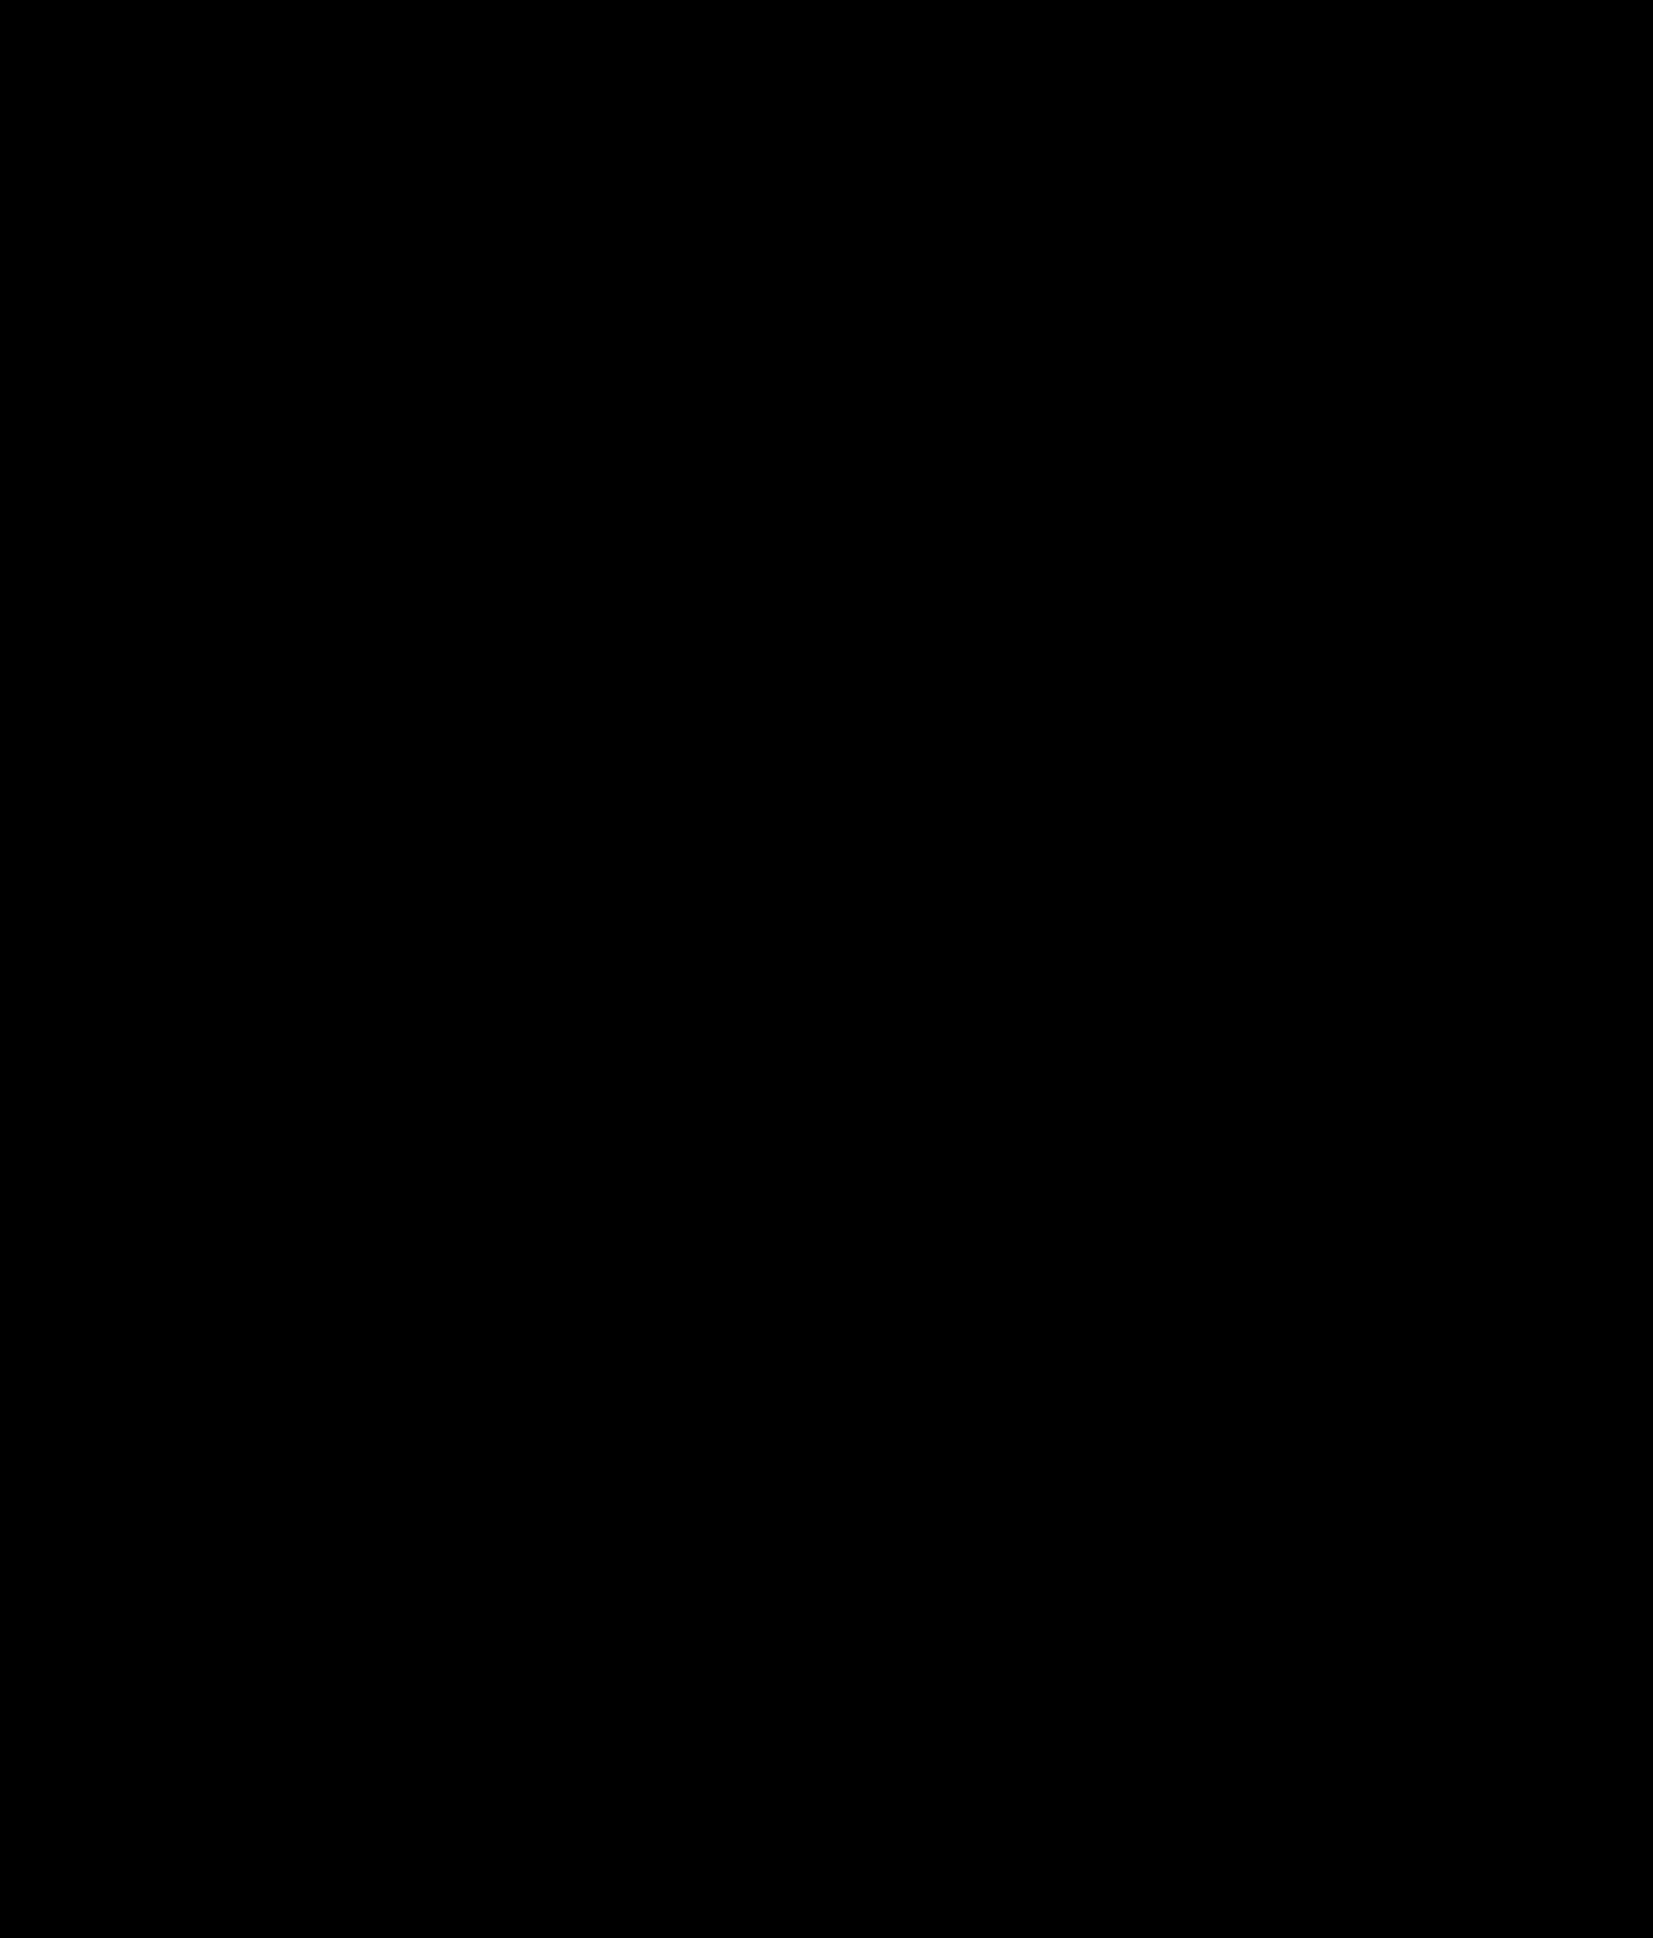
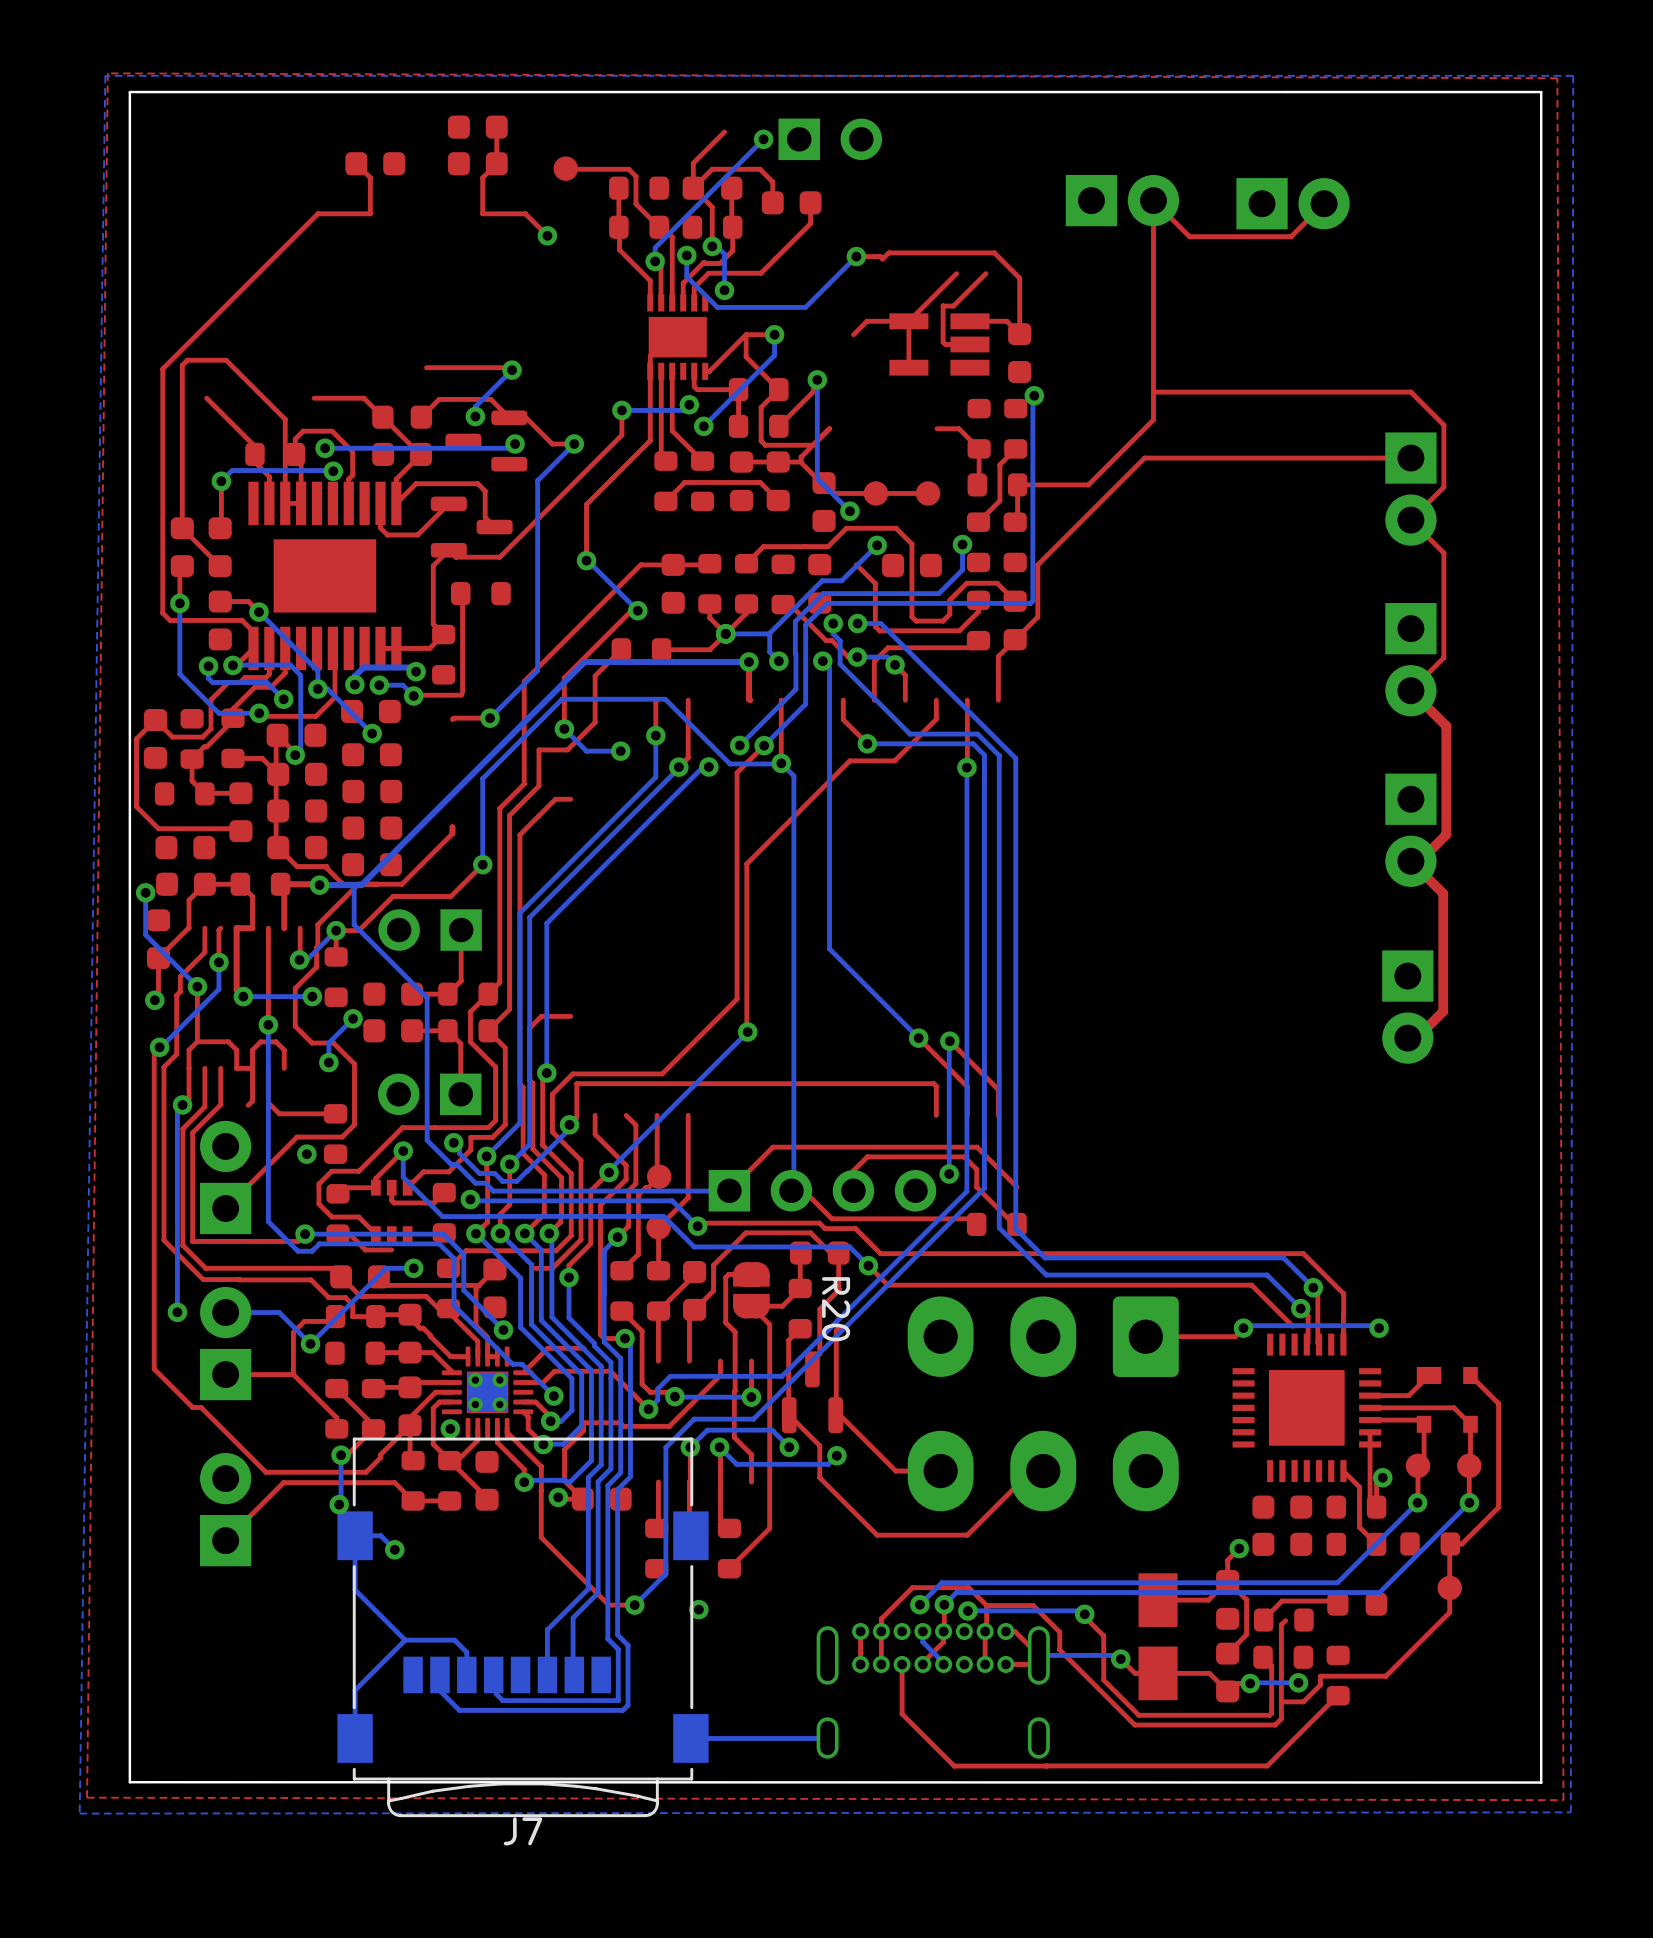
top zone outline: none -> (107, 73) (1557, 78) (1563, 1800) (87, 1797) (107, 73)
bottom zone outline: none -> (1573, 75) (1570, 1812) (79, 1813) (105, 75) (1573, 75)
board edge: none -> (1541, 92) (1541, 1782) (129, 1782) (129, 92) (1541, 92)
part: none -> (477, 127)
top track: none -> (496, 127) (496, 163) (482, 177) (482, 213) (525, 213) (547, 235)
top track: none -> (724, 132) (693, 163) (693, 188)
bottom track: none -> (763, 139) (655, 247) (655, 261)
via: none -> (763, 139)
part: none -> (830, 139)
top track: none -> (356, 163) (370, 177) (370, 213) (317, 213) (162, 368) (162, 613) (170, 620) (242, 620) (253, 631) (253, 648) (236, 665) (232, 665)
part: none -> (375, 163)
part: none -> (477, 163)
top track: none -> (565, 168) (628, 169) (635, 176) (635, 204) (659, 227) (662, 227) (672, 237) (672, 302)
part: none -> (565, 168)
top track: none -> (618, 188) (619, 249) (650, 280) (650, 302)
part: none -> (639, 188)
top track: none -> (693, 188) (712, 169) (759, 169) (772, 182) (772, 202)
top track: none -> (693, 188) (712, 207) (712, 246)
part: none -> (712, 188)
top track: none -> (731, 188) (732, 250) (720, 263) (704, 262) (683, 283) (683, 302)
part: none -> (1122, 200)
part: none -> (791, 202)
top track: none -> (810, 202) (810, 223) (760, 273) (708, 273) (694, 287) (694, 302)
part: none -> (1293, 203)
top track: none -> (1324, 203) (1291, 236) (1189, 236) (1153, 200) (1153, 419) (1088, 484) (1017, 484) (1017, 519) (1015, 522)
part: none -> (639, 227)
part: none -> (712, 227)
via: none -> (547, 235)
bottom track: none -> (712, 246) (716, 246) (724, 254) (724, 290)
via: none -> (712, 246)
bottom track: none -> (686, 255) (686, 276) (717, 307) (805, 307) (856, 256)
via: none -> (686, 255)
top track: none -> (856, 256) (880, 256) (882, 259) (888, 252) (994, 252) (1019, 278) (1019, 334) (1006, 321) (969, 321)
via: none -> (856, 256)
top track: none -> (655, 261) (661, 267) (661, 302)
via: none -> (655, 261)
top track: none -> (956, 273) (908, 321)
top track: none -> (985, 273) (953, 306) (943, 306) (943, 342) (945, 344) (969, 344)
via: none -> (724, 290)
top track: none -> (908, 321) (867, 321) (853, 334)
top track: none -> (908, 321) (908, 367)
top track: none -> (746, 334) (709, 371) (705, 371)
top track: none -> (746, 334) (746, 356) (778, 389) (761, 407) (761, 440) (765, 445) (813, 445)
top track: none -> (774, 334) (746, 334)
bottom track: none -> (774, 334) (774, 355) (703, 426)
via: none -> (774, 334)
top track: none -> (677, 337) (669, 337) (650, 356) (650, 440) (586, 504) (586, 560)
part: none -> (677, 337)
part: none -> (939, 344)
part: none -> (1019, 353)
top track: none -> (426, 367) (509, 367) (512, 370)
bottom track: none -> (512, 370) (475, 406) (475, 416)
via: none -> (512, 370)
top track: none -> (661, 371) (661, 456) (665, 461)
top track: none -> (672, 371) (672, 430) (702, 461)
top track: none -> (694, 371) (694, 386) (697, 389) (738, 389) (738, 426)
top track: none -> (817, 379) (813, 383) (813, 391) (778, 426)
bottom track: none -> (817, 379) (817, 478) (849, 511)
via: none -> (817, 379)
part: none -> (758, 389)
top track: none -> (1153, 392) (1410, 392) (1443, 425) (1443, 487) (1410, 520) (1443, 553) (1443, 657) (1410, 690) (1446, 726) (1446, 834) (1419, 861) (1410, 861) (1443, 893) (1443, 1011) (1416, 1038)
bottom track: none -> (1034, 395) (1032, 600) (1030, 603) (827, 603) (805, 624) (805, 704) (764, 745)
via: none -> (1034, 395)
top track: none -> (206, 398) (254, 446) (254, 462) (269, 476) (269, 503)
top track: none -> (314, 398) (363, 398) (421, 454) (396, 479) (396, 503) (416, 483) (477, 483) (485, 491) (485, 517) (494, 527)
bottom track: none -> (689, 404) (683, 410) (621, 410)
via: none -> (689, 404)
top track: none -> (621, 410) (621, 435) (499, 557) (455, 557) (448, 550) (433, 565) (433, 624) (443, 634) (429, 648) (380, 648)
via: none -> (621, 410)
via: none -> (475, 416)
part: none -> (402, 417)
top track: none -> (421, 417) (439, 399) (490, 399) (509, 417) (526, 417) (552, 444) (574, 444)
via: none -> (703, 426)
part: none -> (758, 426)
top track: none -> (829, 428) (801, 457) (801, 462) (741, 462)
top track: none -> (937, 428) (958, 428) (979, 448) (979, 483) (977, 484)
part: none -> (979, 428)
part: none -> (1015, 428)
part: none -> (486, 440)
bottom track: none -> (515, 444) (510, 448) (325, 448)
via: none -> (515, 444)
bottom track: none -> (574, 444) (537, 480) (537, 670) (490, 718)
via: none -> (574, 444)
via: none -> (325, 448)
top track: none -> (1015, 448) (999, 464) (999, 500) (978, 522)
part: none -> (275, 454)
part: none -> (402, 454)
top track: none -> (1410, 458) (1144, 458) (1037, 564) (1037, 617) (998, 656) (998, 700)
top track: none -> (802, 464) (834, 493) (928, 493)
bottom track: none -> (333, 471) (232, 470) (221, 481)
via: none -> (333, 471)
top track: none -> (221, 481) (220, 528)
via: none -> (221, 481)
part: none -> (665, 481)
part: none -> (702, 481)
part: none -> (741, 481)
part: none -> (778, 481)
part: none -> (997, 484)
part: none -> (1410, 489)
part: none -> (875, 493)
part: none -> (928, 493)
top track: none -> (778, 500) (760, 482) (684, 482) (665, 501)
part: none -> (824, 502)
top track: none -> (348, 503) (348, 479) (352, 475) (352, 451) (332, 431) (303, 431) (295, 439) (295, 454) (301, 460) (301, 503) (285, 503) (285, 419) (226, 360) (187, 360) (182, 365) (182, 528) (220, 566)
top track: none -> (380, 503) (380, 528) (387, 534) (417, 534) (448, 503)
via: none -> (849, 511)
part: none -> (471, 527)
part: none -> (978, 542)
part: none -> (1015, 542)
bottom track: none -> (962, 544) (962, 569) (938, 593) (823, 593) (795, 621) (795, 689) (739, 745)
via: none -> (962, 544)
bottom track: none -> (877, 545) (841, 580) (822, 580) (769, 633) (725, 633)
via: none -> (877, 545)
top track: none -> (805, 546) (763, 546) (746, 563)
top track: none -> (805, 546) (828, 546) (846, 528) (896, 528) (911, 544) (911, 616) (916, 621) (943, 621) (949, 614) (949, 600) (966, 583) (997, 583) (1015, 601)
part: none -> (182, 547)
part: none -> (220, 547)
bottom track: none -> (586, 560) (637, 610)
via: none -> (586, 560)
top track: none -> (709, 563) (640, 564) (524, 681) (524, 784) (499, 808) (499, 982) (470, 1011) (470, 1041) (495, 1066) (495, 1120) (488, 1127) (402, 1127) (358, 1171) (331, 1171) (318, 1184) (318, 1204) (331, 1217) (358, 1217) (375, 1234)
top track: none -> (856, 564) (875, 583) (875, 626) (879, 630) (959, 630) (978, 611) (978, 600)
part: none -> (911, 565)
top track: none -> (182, 566) (179, 568) (179, 603)
part: none -> (324, 575)
part: none -> (673, 583)
part: none -> (709, 583)
part: none -> (746, 583)
part: none -> (819, 583)
part: none -> (783, 584)
top track: none -> (460, 593) (462, 595) (462, 692)
part: none -> (480, 593)
top track: none -> (220, 601) (248, 601) (259, 612)
bottom track: none -> (179, 603) (179, 674) (218, 713) (259, 713)
via: none -> (179, 603)
top track: none -> (709, 603) (709, 618) (725, 633)
top track: none -> (746, 603) (746, 613) (709, 649) (661, 649)
top track: none -> (783, 604) (790, 604) (826, 640) (831, 640) (848, 657) (857, 657)
top track: none -> (637, 610) (631, 610) (564, 677) (564, 728)
via: none -> (637, 610)
bottom track: none -> (259, 612) (317, 670) (317, 689) (327, 689) (372, 733)
via: none -> (259, 612)
part: none -> (220, 620)
part: none -> (978, 620)
part: none -> (1015, 620)
bottom track: none -> (833, 623) (833, 633) (840, 640) (840, 664) (910, 734) (977, 734) (999, 755) (999, 1227) (1046, 1275) (1267, 1275) (1300, 1308)
via: none -> (833, 623)
bottom track: none -> (857, 623) (880, 623) (1015, 758) (1015, 1228) (1044, 1257) (1283, 1257) (1313, 1287)
via: none -> (857, 623)
via: none -> (725, 633)
bottom track: none -> (769, 633) (769, 652) (778, 661)
top track: none -> (978, 640) (971, 647) (887, 647) (874, 661) (874, 700)
top track: none -> (269, 648) (269, 674) (265, 677) (245, 677) (240, 682) (228, 682) (210, 699) (210, 728) (202, 737) (172, 737) (155, 720) (136, 738) (136, 806) (158, 828) (238, 828) (240, 831)
top track: none -> (285, 648) (285, 673) (270, 687) (254, 687) (232, 709) (232, 720) (192, 759) (192, 781) (204, 793) (240, 793)
top track: none -> (332, 648) (334, 650) (334, 697) (316, 716) (262, 716) (259, 713)
top track: none -> (621, 649) (595, 675) (595, 722) (567, 749) (538, 749) (538, 786) (509, 815) (509, 1009) (488, 1030) (505, 1047) (505, 1124) (492, 1137) (470, 1137) (470, 1149) (448, 1171) (423, 1171) (407, 1187)
part: none -> (641, 649)
part: none -> (443, 654)
bottom track: none -> (857, 657) (887, 657) (895, 664)
via: none -> (857, 657)
part: none -> (1410, 659)
top track: none -> (748, 661) (750, 700)
bottom track: none -> (748, 661) (584, 661) (361, 885) (319, 885)
via: none -> (748, 661)
via: none -> (778, 661)
bottom track: none -> (822, 661) (829, 667) (829, 948) (918, 1038)
via: none -> (822, 661)
top track: none -> (895, 664) (905, 675) (905, 700)
via: none -> (895, 664)
bottom track: none -> (232, 665) (290, 665) (300, 675) (300, 749) (295, 755)
via: none -> (232, 665)
bottom track: none -> (208, 666) (208, 678) (212, 682) (266, 682) (283, 699)
via: none -> (208, 666)
bottom track: none -> (416, 671) (411, 667) (363, 667) (354, 676) (354, 684)
via: none -> (416, 671)
via: none -> (354, 684)
bottom track: none -> (379, 685) (402, 685) (413, 696)
via: none -> (379, 685)
via: none -> (317, 689)
top track: none -> (461, 695) (413, 696)
via: none -> (413, 696)
via: none -> (283, 699)
top track: none -> (657, 700) (655, 735)
top track: none -> (688, 700) (688, 757) (678, 767)
top track: none -> (781, 700) (781, 763)
top track: none -> (843, 700) (843, 719) (867, 743)
top track: none -> (936, 700) (936, 719) (894, 760) (849, 760) (746, 863) (747, 1032)
top track: none -> (967, 700) (966, 767)
part: none -> (370, 711)
via: none -> (259, 713)
top track: none -> (490, 718) (452, 719)
via: none -> (490, 718)
bottom track: none -> (564, 728) (586, 751) (620, 751)
via: none -> (564, 728)
via: none -> (372, 733)
part: none -> (296, 735)
bottom track: none -> (655, 735) (655, 777) (519, 912) (519, 1123) (486, 1156)
via: none -> (655, 735)
part: none -> (155, 738)
part: none -> (192, 738)
part: none -> (232, 738)
bottom track: none -> (867, 743) (973, 743) (984, 755) (984, 1188) (753, 1419) (694, 1419) (665, 1447) (665, 1573) (634, 1605)
via: none -> (867, 743)
via: none -> (739, 745)
top track: none -> (764, 745) (737, 772) (737, 999) (662, 1073) (572, 1073) (552, 1094) (552, 1131) (580, 1160) (580, 1239) (552, 1268) (535, 1268)
via: none -> (764, 745)
via: none -> (620, 751)
part: none -> (371, 754)
top track: none -> (295, 755) (277, 735) (276, 845) (297, 866) (326, 866) (342, 884) (401, 884) (452, 833) (452, 827)
via: none -> (295, 755)
top track: none -> (232, 758) (262, 758) (278, 774)
via: none -> (781, 763)
bottom track: none -> (678, 767) (529, 917) (529, 1144) (509, 1164)
via: none -> (678, 767)
bottom track: none -> (708, 767) (703, 767) (546, 923) (546, 1073)
via: none -> (708, 767)
bottom track: none -> (966, 767) (966, 1191) (781, 1376) (670, 1376) (657, 1388) (657, 1400) (648, 1409)
via: none -> (966, 767)
part: none -> (297, 774)
part: none -> (372, 791)
part: none -> (184, 793)
top track: none -> (570, 799) (555, 799) (519, 834) (519, 1084) (523, 1087) (523, 1153) (544, 1174) (544, 1213) (524, 1233)
part: none -> (297, 810)
part: none -> (240, 812)
part: none -> (372, 828)
part: none -> (1410, 830)
part: none -> (185, 847)
part: none -> (297, 847)
part: none -> (371, 864)
top track: none -> (482, 864) (450, 896) (392, 896) (358, 930) (336, 930) (336, 956)
bottom track: none -> (482, 864) (482, 778) (562, 699) (665, 699) (730, 763) (781, 763) (793, 775) (793, 1188) (791, 1190)
via: none -> (482, 864)
part: none -> (185, 884)
part: none -> (260, 884)
top track: none -> (358, 884) (317, 924) (316, 967) (295, 988) (295, 1026) (311, 1043) (333, 1043) (354, 1064) (354, 1124) (342, 1137) (297, 1137) (225, 1208)
top track: none -> (319, 885) (280, 884) (284, 887) (284, 928)
via: none -> (319, 885)
bottom track: none -> (354, 885) (354, 924) (427, 997) (427, 1140) (451, 1164) (456, 1164) (475, 1183) (485, 1183) (493, 1191) (729, 1191)
bottom track: none -> (145, 892) (145, 934) (197, 986)
via: none -> (145, 892)
top track: none -> (204, 928) (204, 952) (180, 976) (180, 991) (176, 995) (176, 1054) (163, 1067) (163, 1240) (203, 1279) (311, 1279) (328, 1297) (345, 1297) (352, 1304) (352, 1316) (410, 1314) (410, 1318) (419, 1328) (423, 1328) (450, 1356) (468, 1356)
top track: none -> (220, 928) (218, 930) (218, 962)
top track: none -> (268, 928) (268, 1024)
top track: none -> (300, 928) (299, 959)
bottom track: none -> (336, 930) (306, 959) (299, 959)
via: none -> (336, 930)
part: none -> (430, 930)
top track: none -> (461, 930) (461, 980) (447, 994) (412, 994)
part: none -> (158, 939)
via: none -> (299, 959)
bottom track: none -> (218, 962) (218, 989) (159, 1047)
via: none -> (218, 962)
part: none -> (336, 977)
top track: none -> (197, 986) (197, 1041) (189, 1050) (189, 1098) (182, 1104)
via: none -> (197, 986)
part: none -> (393, 994)
part: none -> (468, 994)
top track: none -> (243, 996) (236, 989) (236, 928) (252, 928) (252, 896) (240, 884) (204, 884) (189, 900) (189, 928) (158, 958) (158, 996) (154, 1000)
via: none -> (243, 996)
bottom track: none -> (312, 996) (243, 996)
via: none -> (312, 996)
via: none -> (154, 1000)
part: none -> (1407, 1007)
top track: none -> (570, 1016) (541, 1016) (529, 1028) (529, 1080) (532, 1083) (532, 1149) (561, 1177) (560, 1221) (549, 1233)
bottom track: none -> (353, 1018) (328, 1043) (328, 1062)
via: none -> (353, 1018)
bottom track: none -> (268, 1024) (268, 1221) (297, 1251) (312, 1251) (319, 1243) (439, 1243) (454, 1258) (454, 1305) (512, 1364) (522, 1364) (553, 1396)
via: none -> (268, 1024)
part: none -> (393, 1030)
top track: none -> (412, 1030) (447, 1030) (460, 1043) (460, 1094)
part: none -> (468, 1030)
bottom track: none -> (747, 1032) (609, 1172)
via: none -> (747, 1032)
top track: none -> (918, 1038) (967, 1086) (967, 1115)
via: none -> (918, 1038)
top track: none -> (197, 1041) (228, 1041) (236, 1050) (236, 1068) (252, 1068)
top track: none -> (949, 1041) (998, 1089) (998, 1115)
bottom track: none -> (949, 1041) (949, 1174)
via: none -> (949, 1041)
top track: none -> (159, 1047) (154, 1052) (154, 1369) (192, 1407) (201, 1407) (265, 1472) (366, 1472) (410, 1425)
via: none -> (159, 1047)
via: none -> (328, 1062)
top track: none -> (204, 1068) (204, 1106) (182, 1128) (182, 1245) (205, 1268) (332, 1268) (360, 1296) (426, 1296) (438, 1308) (448, 1308) (448, 1312) (477, 1341) (477, 1356)
top track: none -> (220, 1068) (220, 1104) (192, 1132) (192, 1241) (297, 1241) (305, 1234)
top track: none -> (268, 1068) (268, 1102) (279, 1113) (335, 1113)
top track: none -> (284, 1068) (284, 1050) (276, 1041) (260, 1041) (252, 1050) (252, 1101) (248, 1105)
top track: none -> (546, 1073) (542, 1077) (542, 1145) (571, 1173) (571, 1235) (556, 1250) (466, 1250) (448, 1268)
via: none -> (546, 1073)
part: none -> (429, 1094)
bottom track: none -> (182, 1104) (177, 1110) (177, 1312)
via: none -> (182, 1104)
top track: none -> (595, 1115) (595, 1134) (626, 1165) (626, 1179) (600, 1205) (600, 1334) (604, 1338) (625, 1338)
top track: none -> (626, 1115) (635, 1125) (635, 1183) (628, 1190) (628, 1226) (617, 1237)
top track: none -> (657, 1115) (657, 1174) (659, 1176) (638, 1194) (638, 1254) (621, 1270)
top track: none -> (688, 1115) (688, 1197) (658, 1227) (658, 1270)
top track: none -> (936, 1115) (936, 1086) (933, 1083) (576, 1083) (576, 1117) (569, 1124)
bottom track: none -> (569, 1124) (569, 1129) (527, 1171)
via: none -> (569, 1124)
part: none -> (335, 1133)
bottom track: none -> (453, 1142) (459, 1148) (459, 1153) (479, 1173) (494, 1173) (502, 1181) (516, 1181) (526, 1171)
via: none -> (453, 1142)
top track: none -> (403, 1151) (375, 1178) (375, 1187) (344, 1187) (338, 1193)
bottom track: none -> (403, 1151) (403, 1177) (442, 1216) (480, 1216)
via: none -> (403, 1151)
via: none -> (306, 1154)
top track: none -> (486, 1156) (487, 1222) (475, 1233)
via: none -> (486, 1156)
top track: none -> (509, 1164) (509, 1204) (500, 1214) (500, 1233)
via: none -> (509, 1164)
top track: none -> (609, 1172) (590, 1190) (590, 1243) (568, 1265) (568, 1277)
via: none -> (609, 1172)
via: none -> (949, 1174)
part: none -> (659, 1176)
part: none -> (225, 1177)
top track: none -> (391, 1187) (391, 1200) (394, 1202) (433, 1202) (444, 1192)
top track: none -> (1016, 1187) (977, 1147) (773, 1147) (729, 1190)
top track: none -> (791, 1190) (803, 1190) (831, 1218) (971, 1218) (976, 1224)
part: none -> (822, 1190)
top track: none -> (853, 1190) (853, 1170) (867, 1156) (964, 1156) (976, 1169) (976, 1187) (1013, 1224) (1016, 1224)
bottom track: none -> (470, 1199) (672, 1200) (697, 1226)
via: none -> (470, 1199)
part: none -> (391, 1210)
part: none -> (444, 1212)
part: none -> (338, 1213)
bottom track: none -> (480, 1216) (663, 1216) (694, 1246) (849, 1246) (868, 1265)
part: none -> (996, 1224)
top track: none -> (697, 1226) (700, 1223) (819, 1223) (824, 1228) (855, 1228) (880, 1253) (1303, 1253) (1343, 1293) (1343, 1314)
via: none -> (697, 1226)
part: none -> (658, 1227)
via: none -> (475, 1233)
bottom track: none -> (476, 1233) (520, 1278) (520, 1327) (571, 1378) (571, 1410) (561, 1421) (550, 1421)
bottom track: none -> (500, 1233) (531, 1264) (531, 1324) (581, 1374) (581, 1425) (563, 1444) (543, 1444)
via: none -> (500, 1233)
bottom track: none -> (524, 1233) (541, 1249) (541, 1320) (591, 1370) (591, 1460) (570, 1482) (565, 1480) (526, 1480) (524, 1482)
via: none -> (524, 1233)
bottom track: none -> (549, 1233) (551, 1236) (551, 1317) (601, 1366) (601, 1464) (588, 1477) (588, 1588) (547, 1629) (547, 1674)
via: none -> (549, 1233)
bottom track: none -> (305, 1234) (443, 1234) (463, 1254) (463, 1290) (503, 1329)
via: none -> (305, 1234)
top track: none -> (338, 1234) (349, 1234) (365, 1249) (391, 1249)
bottom track: none -> (617, 1237) (604, 1250) (604, 1341) (620, 1358) (620, 1472) (607, 1485) (607, 1638) (618, 1649) (618, 1700) (502, 1700) (496, 1693)
via: none -> (617, 1237)
top track: none -> (800, 1253) (800, 1288) (782, 1306) (751, 1306) (769, 1324) (769, 1528) (729, 1568)
part: none -> (819, 1253)
top track: none -> (868, 1265) (887, 1285) (1251, 1285) (1292, 1326)
via: none -> (868, 1265)
bottom track: none -> (413, 1268) (386, 1268) (310, 1343) (279, 1312) (225, 1312)
via: none -> (413, 1268)
top track: none -> (494, 1269) (476, 1288) (476, 1325) (487, 1337) (487, 1356) (497, 1356)
top track: none -> (694, 1271) (694, 1275) (658, 1311) (658, 1361)
top track: none -> (751, 1274) (728, 1274) (725, 1277) (725, 1322) (735, 1332) (734, 1437) (751, 1454) (751, 1482)
part: none -> (359, 1276)
top track: none -> (378, 1276) (387, 1285) (479, 1285)
bottom track: none -> (568, 1277) (568, 1317) (610, 1362) (610, 1468) (598, 1481) (598, 1592) (573, 1617) (574, 1674)
via: none -> (568, 1277)
top track: none -> (1313, 1287) (1317, 1292) (1319, 1344)
via: none -> (1313, 1287)
part: none -> (448, 1288)
part: none -> (494, 1288)
part: none -> (621, 1290)
part: none -> (658, 1290)
part: none -> (694, 1290)
part: none -> (751, 1290)
R20: none -> (800, 1308)
top track: none -> (1300, 1308) (1308, 1315) (1308, 1343)
via: none -> (1300, 1308)
top track: none -> (621, 1311) (642, 1331) (642, 1384) (650, 1392) (670, 1392) (674, 1396)
via: none -> (177, 1312)
top track: none -> (1343, 1314) (1343, 1344)
top track: none -> (335, 1316) (330, 1321) (304, 1321) (293, 1332) (293, 1374)
part: none -> (355, 1316)
top track: none -> (839, 1327) (836, 1330) (835, 1415) (839, 1415) (895, 1471) (940, 1471)
top track: none -> (800, 1328) (788, 1340) (788, 1414) (819, 1445) (819, 1477) (877, 1535) (967, 1535) (1031, 1471) (1043, 1471)
top track: none -> (1243, 1328) (1234, 1336) (1145, 1336)
via: none -> (1243, 1328)
bottom track: none -> (1379, 1328) (1376, 1325) (1245, 1325) (1243, 1328)
via: none -> (1379, 1328)
via: none -> (503, 1329)
part: none -> (410, 1333)
bottom track: none -> (625, 1338) (630, 1343) (630, 1476) (617, 1489) (617, 1634) (628, 1645) (628, 1705) (622, 1710) (459, 1710) (439, 1690) (439, 1674)
via: none -> (625, 1338)
part: none -> (225, 1343)
via: none -> (310, 1343)
top track: none -> (584, 1348) (547, 1348) (523, 1372)
part: none -> (355, 1353)
top track: none -> (375, 1353) (432, 1352) (451, 1372)
top track: none -> (819, 1354) (819, 1309) (839, 1289) (838, 1253) (830, 1253) (810, 1232) (745, 1232) (713, 1265) (713, 1290) (689, 1314) (689, 1361)
top track: none -> (720, 1361) (720, 1375) (669, 1426) (623, 1426) (620, 1422) (583, 1422) (583, 1430) (564, 1449) (564, 1480) (582, 1499) (560, 1499) (558, 1497)
top track: none -> (751, 1361) (751, 1397)
top track: none -> (293, 1374) (336, 1417) (336, 1428)
top track: none -> (293, 1374) (225, 1374)
top track: none -> (1428, 1375) (1408, 1395) (1370, 1395)
top track: none -> (1470, 1375) (1498, 1403) (1498, 1507) (1461, 1543) (1449, 1544) (1449, 1612) (1385, 1676) (1320, 1676) (1320, 1684) (1303, 1701) (1281, 1701)
top track: none -> (451, 1382) (414, 1382) (410, 1387) (373, 1388)
top track: none -> (523, 1382) (543, 1382) (554, 1371) (610, 1371) (648, 1409)
top track: none -> (336, 1388) (373, 1425) (373, 1428) (347, 1455) (341, 1455)
top track: none -> (451, 1392) (435, 1392) (410, 1417) (410, 1457) (413, 1460)
part: none -> (487, 1392)
part: none -> (812, 1392)
via: none -> (553, 1396)
bottom track: none -> (674, 1396) (751, 1397)
via: none -> (674, 1396)
via: none -> (751, 1397)
part: none -> (1447, 1399)
top track: none -> (451, 1402) (439, 1402) (433, 1408) (433, 1444) (486, 1499)
top track: none -> (523, 1402) (535, 1402) (550, 1416)
part: none -> (1043, 1403)
part: none -> (410, 1406)
part: none -> (1306, 1407)
top track: none -> (1370, 1407) (1454, 1407) (1470, 1424) (1469, 1502)
part: none -> (336, 1408)
part: none -> (373, 1408)
via: none -> (648, 1409)
top track: none -> (523, 1411) (528, 1416) (528, 1429) (543, 1444)
top track: none -> (1370, 1420) (1419, 1420) (1424, 1424) (1424, 1459) (1417, 1465) (1417, 1502)
via: none -> (550, 1421)
top track: none -> (477, 1427) (477, 1440) (457, 1460) (449, 1460)
top track: none -> (497, 1427) (497, 1442) (524, 1469) (524, 1482)
top track: none -> (507, 1427) (507, 1432) (541, 1466) (541, 1537) (608, 1605) (634, 1605)
via: none -> (450, 1428)
top track: none -> (1370, 1432) (1370, 1500) (1376, 1507) (1376, 1483) (1382, 1477)
via: none -> (543, 1444)
top track: none -> (690, 1447) (689, 1525) (693, 1529)
via: none -> (690, 1447)
top track: none -> (719, 1447) (720, 1519) (729, 1528)
bottom track: none -> (719, 1447) (736, 1464) (828, 1464) (836, 1455)
via: none -> (719, 1447)
bottom track: none -> (789, 1447) (772, 1430) (707, 1430) (690, 1447)
via: none -> (789, 1447)
bottom track: none -> (341, 1455) (341, 1502) (339, 1504)
via: none -> (341, 1455)
via: none -> (836, 1455)
part: none -> (1417, 1465)
part: none -> (1469, 1465)
top track: none -> (1343, 1471) (1359, 1487) (1359, 1527) (1376, 1544)
via: none -> (1382, 1477)
part: none -> (413, 1480)
part: none -> (449, 1480)
part: none -> (486, 1480)
via: none -> (524, 1482)
top track: none -> (658, 1482) (658, 1526) (656, 1528)
via: none -> (558, 1497)
part: none -> (601, 1499)
top track: none -> (449, 1500) (413, 1500) (394, 1482) (283, 1482) (225, 1540)
bottom track: none -> (1417, 1502) (1337, 1582) (941, 1582) (919, 1604)
via: none -> (1417, 1502)
bottom track: none -> (1469, 1502) (1379, 1592) (956, 1592) (944, 1604)
via: none -> (1469, 1502)
via: none -> (339, 1504)
part: none -> (1282, 1507)
part: none -> (1356, 1507)
part: none -> (225, 1509)
part: none -> (1430, 1543)
part: none -> (1282, 1544)
part: none -> (1356, 1544)
part: none -> (656, 1548)
part: none -> (729, 1548)
top track: none -> (1239, 1548) (1227, 1560) (1227, 1580)
via: none -> (1239, 1548)
bottom track: none -> (394, 1549) (380, 1535) (355, 1535) (355, 1590) (405, 1640)
via: none -> (394, 1549)
top track: none -> (1227, 1580) (1208, 1600) (1158, 1600)
top track: none -> (1227, 1580) (1246, 1599) (1246, 1634) (1227, 1653)
part: none -> (1449, 1587)
part: none -> (1227, 1599)
via: none -> (919, 1604)
top track: none -> (944, 1604) (943, 1642) (922, 1664)
via: none -> (944, 1604)
top track: none -> (1337, 1604) (1334, 1601) (1282, 1601) (1263, 1619)
part: none -> (1357, 1604)
via: none -> (634, 1605)
top track: none -> (986, 1605) (1033, 1605) (1059, 1632) (1059, 1649) (1134, 1725) (1275, 1725) (1281, 1718) (1281, 1624) (1285, 1620)
top track: none -> (986, 1605) (968, 1587) (912, 1587) (881, 1618) (881, 1664)
top track: none -> (986, 1605) (986, 1629)
via: none -> (698, 1609)
bottom track: none -> (968, 1610) (1081, 1610) (1084, 1614)
via: none -> (967, 1611)
top track: none -> (1084, 1614) (1084, 1616) (1103, 1635) (1103, 1680) (1138, 1715) (1269, 1715) (1271, 1713) (1271, 1665) (1263, 1657)
via: none -> (1084, 1614)
part: none -> (1283, 1620)
J7: none -> (523, 1627)
top track: none -> (860, 1631) (860, 1664)
bottom track: none -> (922, 1631) (922, 1642) (943, 1664)
top track: none -> (985, 1631) (985, 1664)
top track: none -> (1005, 1631) (1014, 1631) (1038, 1655) (1029, 1664) (1005, 1664)
part: none -> (1158, 1636)
bottom track: none -> (405, 1640) (454, 1640) (466, 1652) (466, 1674)
bottom track: none -> (405, 1640) (355, 1690) (355, 1738)
bottom track: none -> (1038, 1655) (1117, 1655) (1120, 1659)
part: none -> (1283, 1657)
top track: none -> (1120, 1659) (1135, 1673) (1209, 1673) (1227, 1691) (1235, 1683) (1250, 1683)
via: none -> (1120, 1659)
top track: none -> (902, 1664) (902, 1713) (954, 1766) (1267, 1765) (1338, 1695)
part: none -> (1227, 1672)
part: none -> (1338, 1675)
bottom track: none -> (1298, 1682) (1250, 1683)
via: none -> (1298, 1682)
via: none -> (1250, 1683)
part: none -> (933, 1690)
bottom track: none -> (827, 1737) (690, 1738)

